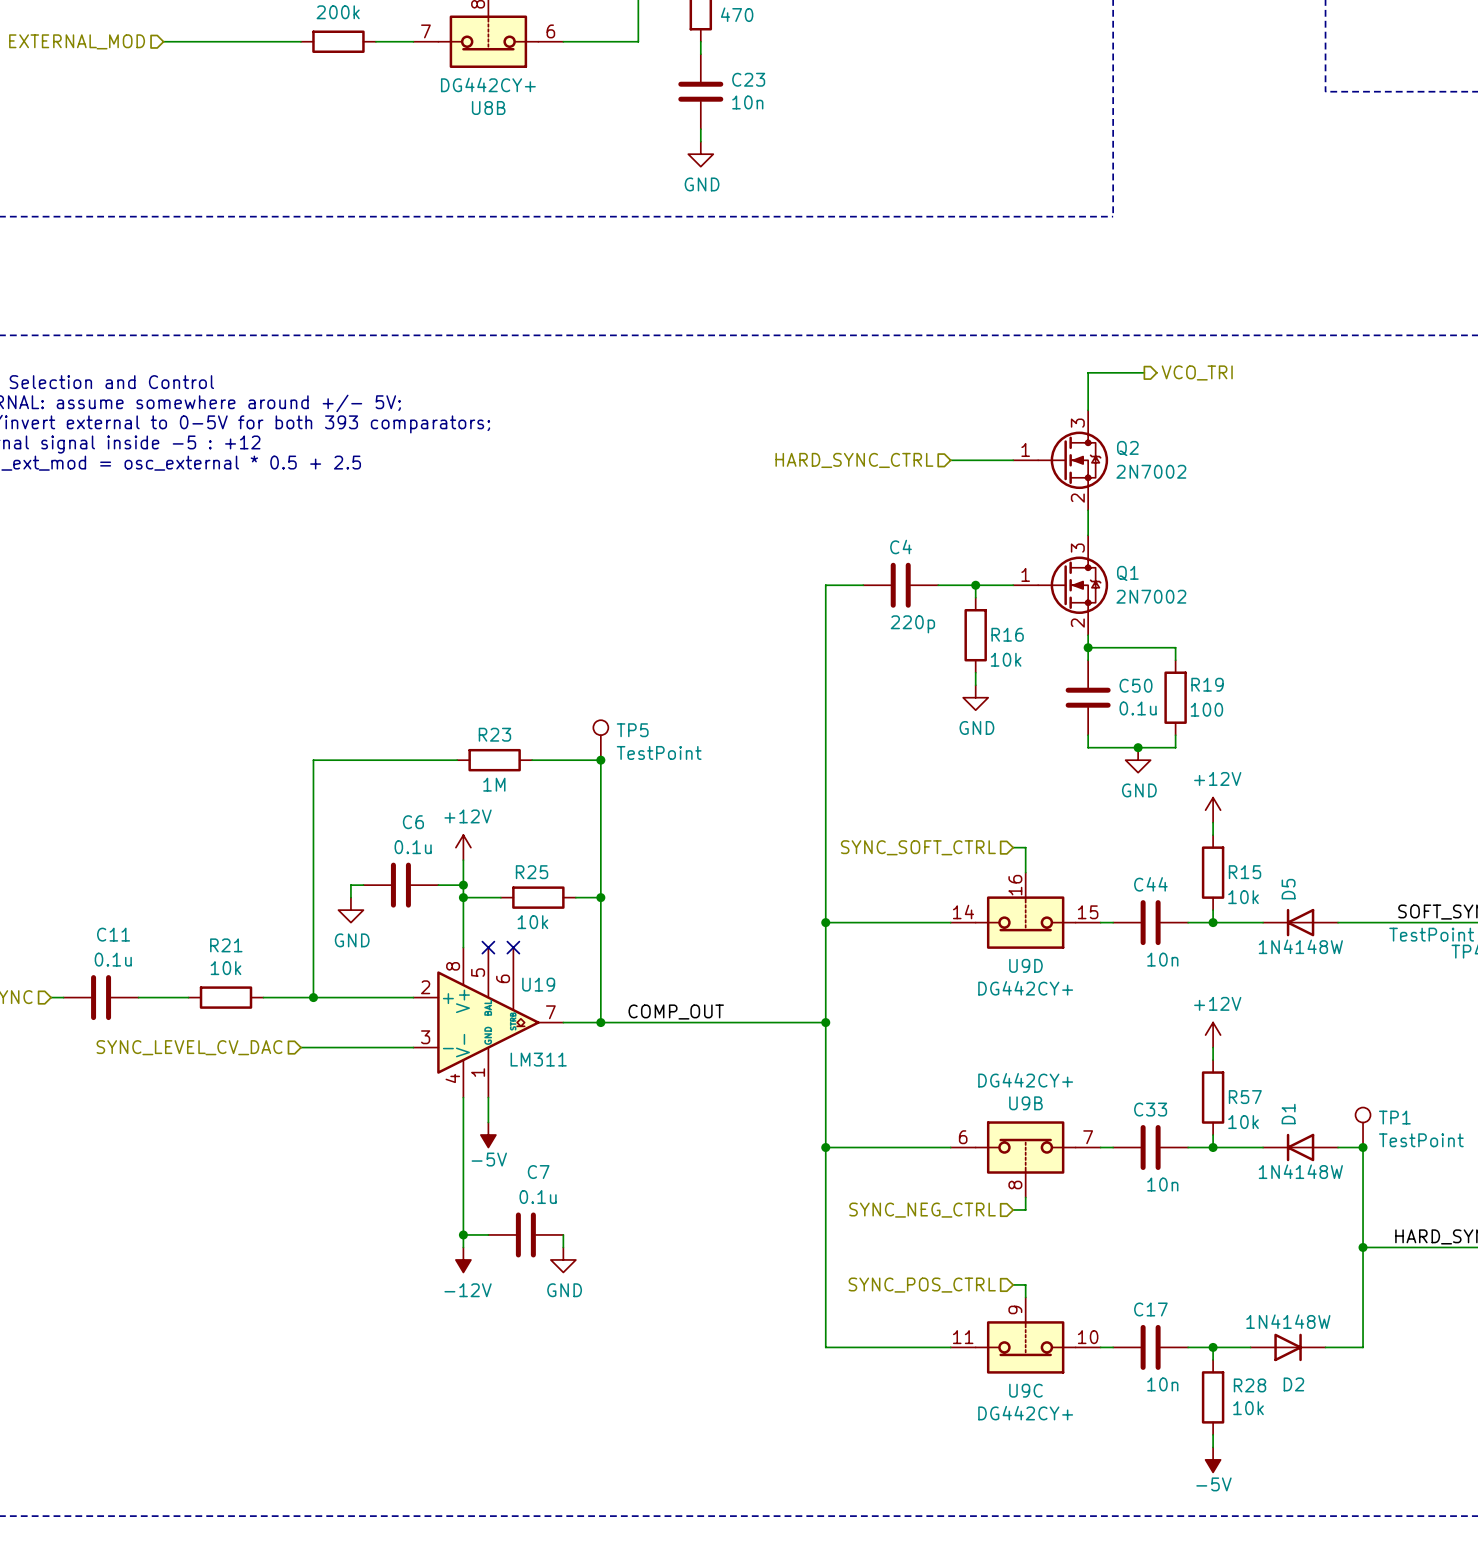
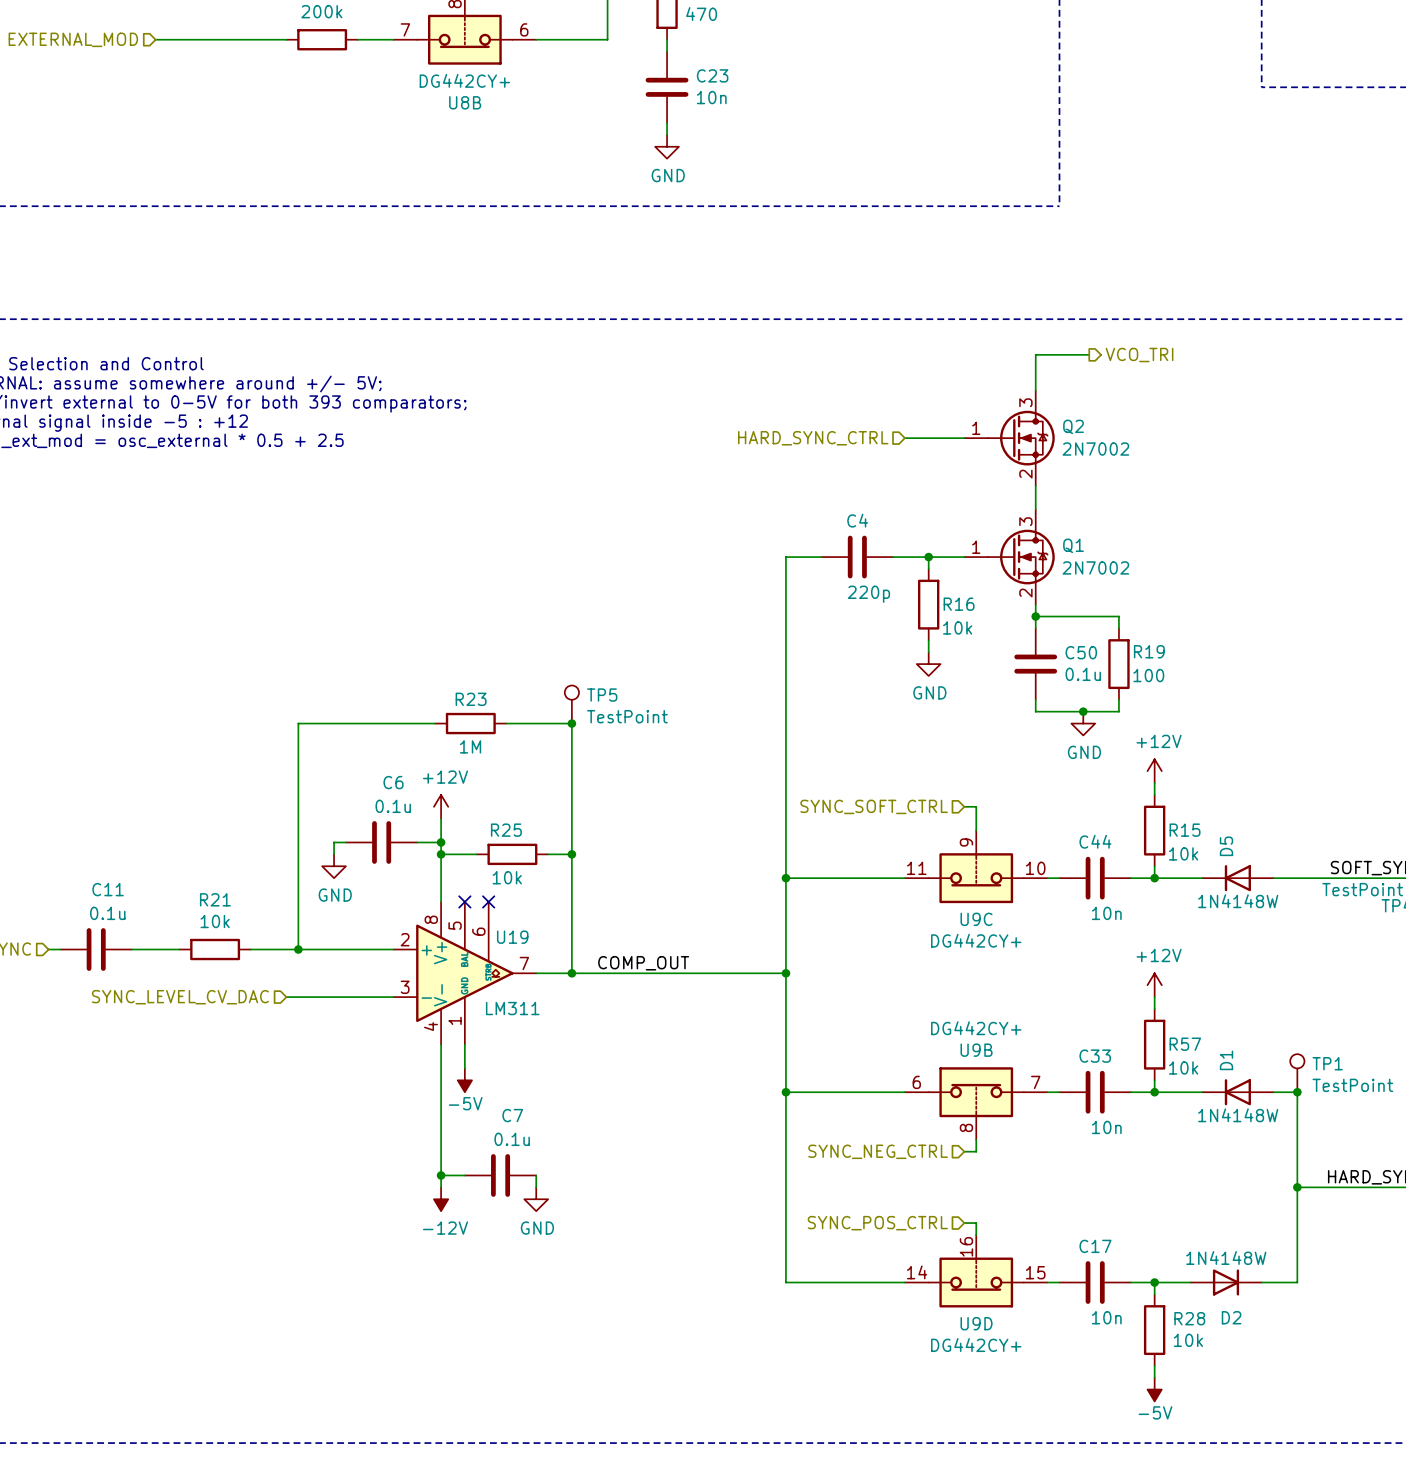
U9D position: (1025, 910) -> (976, 1271)
U9C position: (1025, 1335) -> (976, 866)

